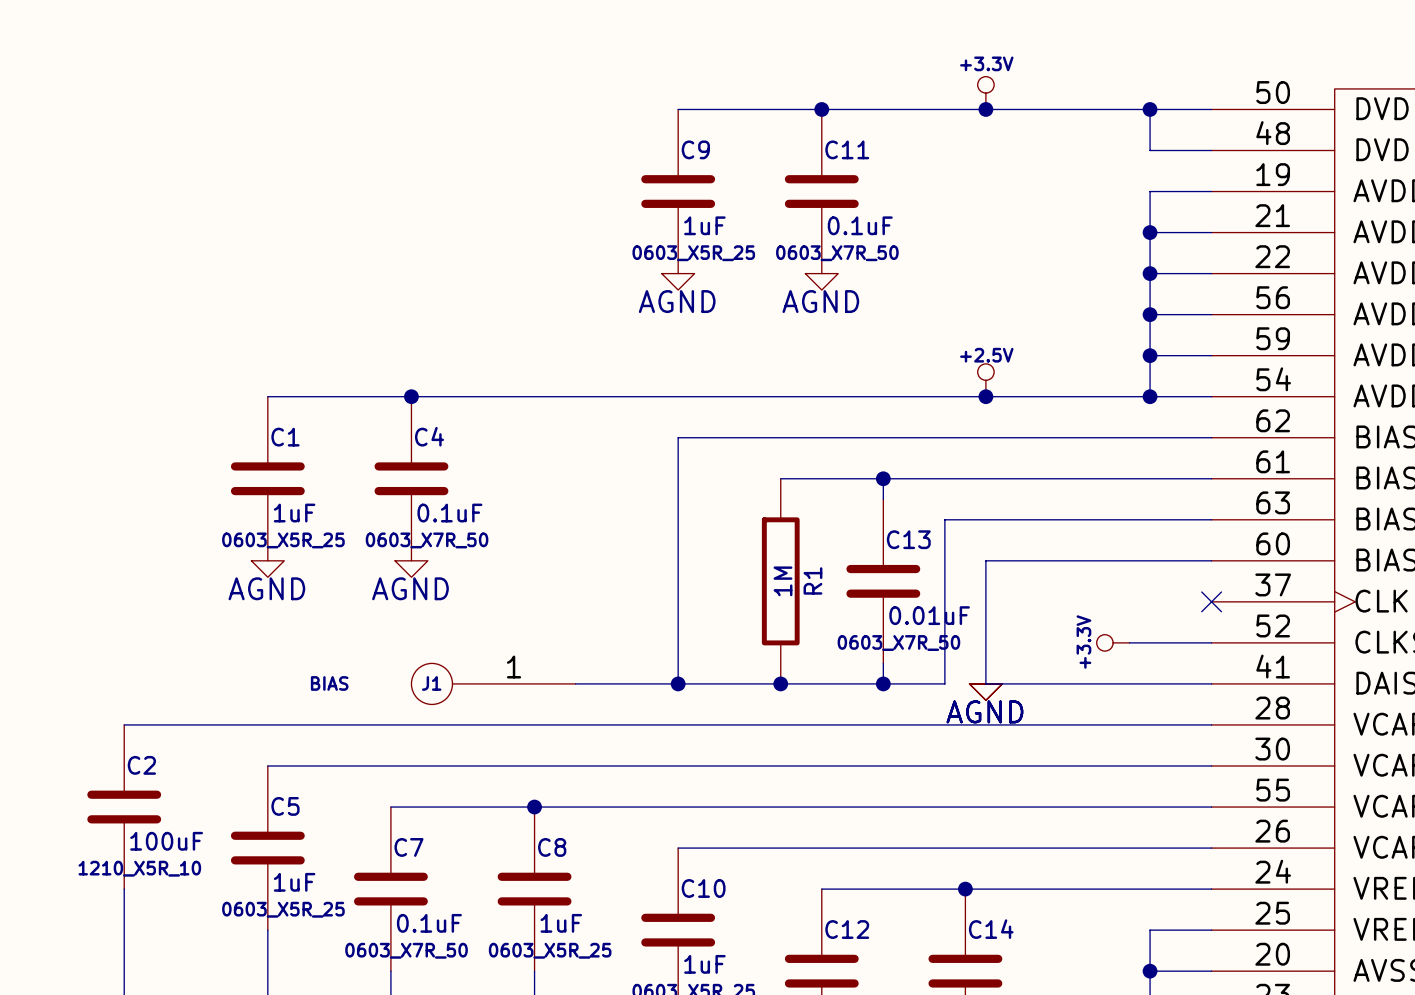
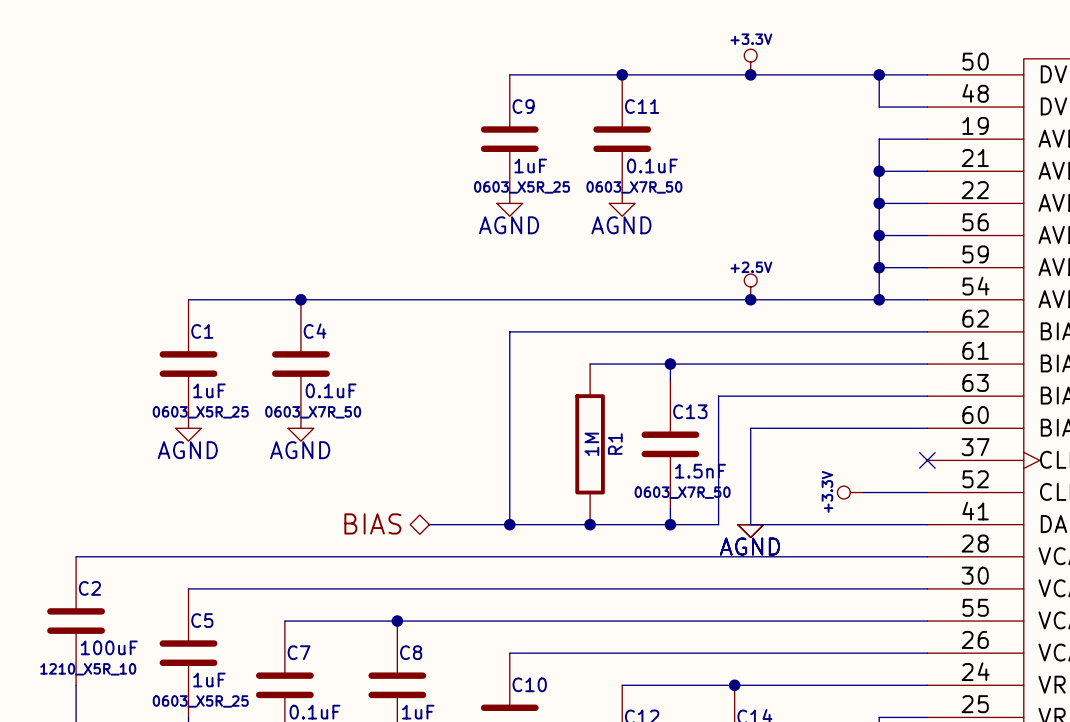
C13 value: 0.01uF (929, 615) -> 1.5nF (700, 471)
J1: BIAS (493, 683) -> none
hierarchical label: none -> BIAS (372, 523)

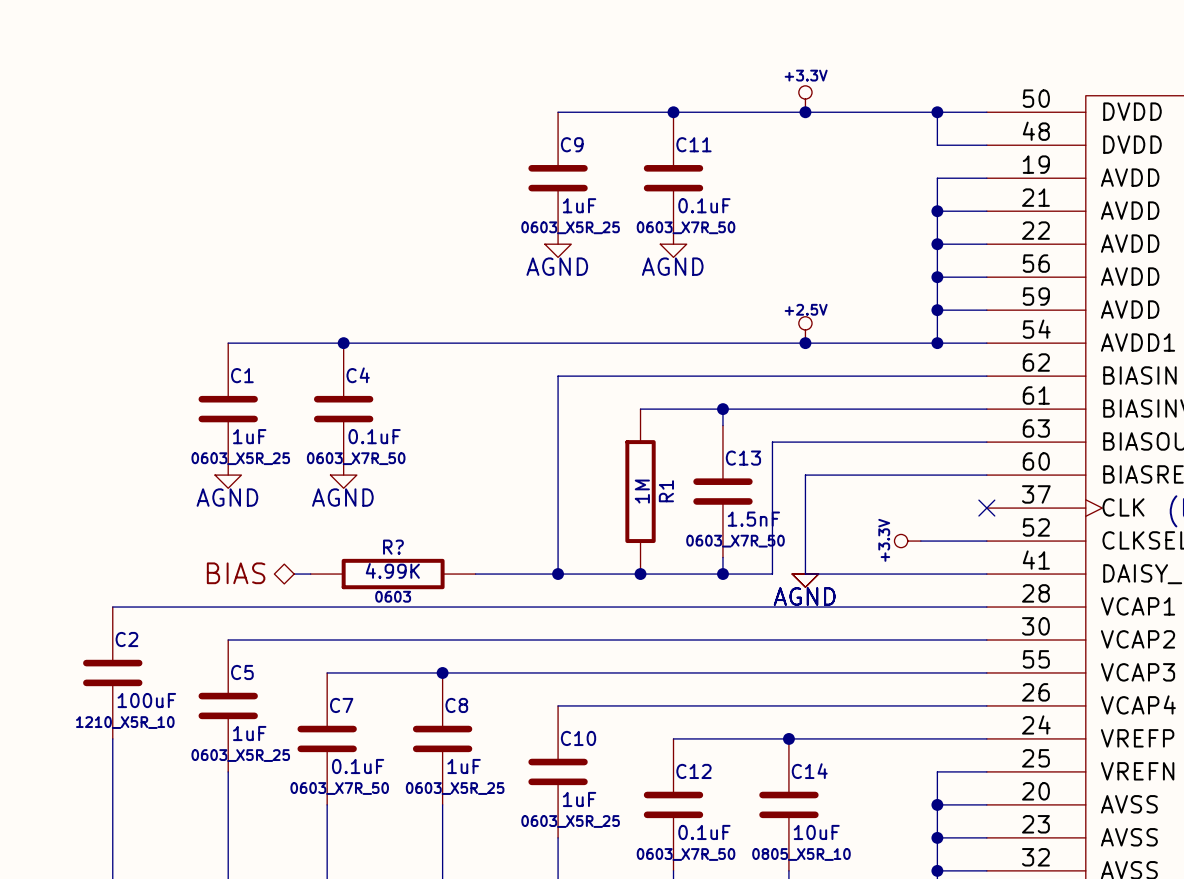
hierarchical label position: BIAS (372, 523) -> BIAS (236, 573)
wire: none -> (294, 574) (310, 574)
R?: none -> 4.99K (393, 574)

